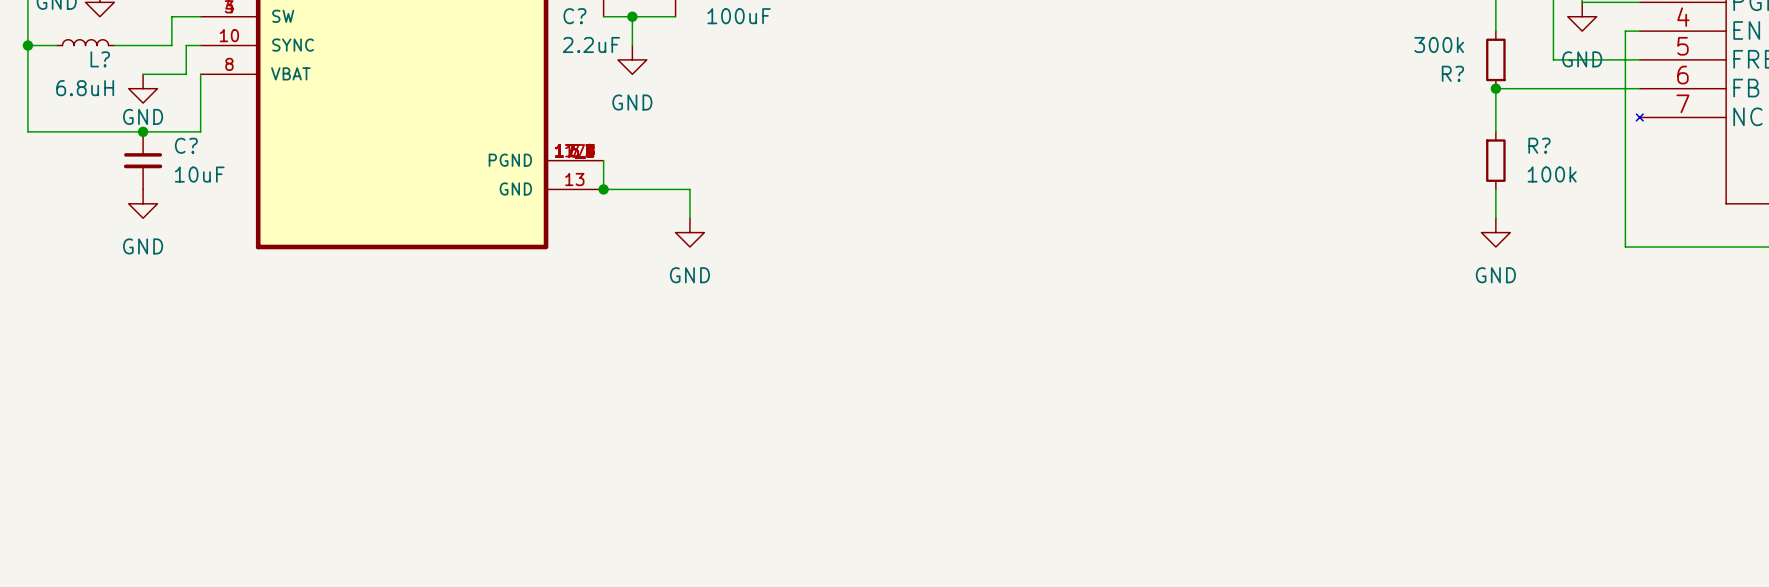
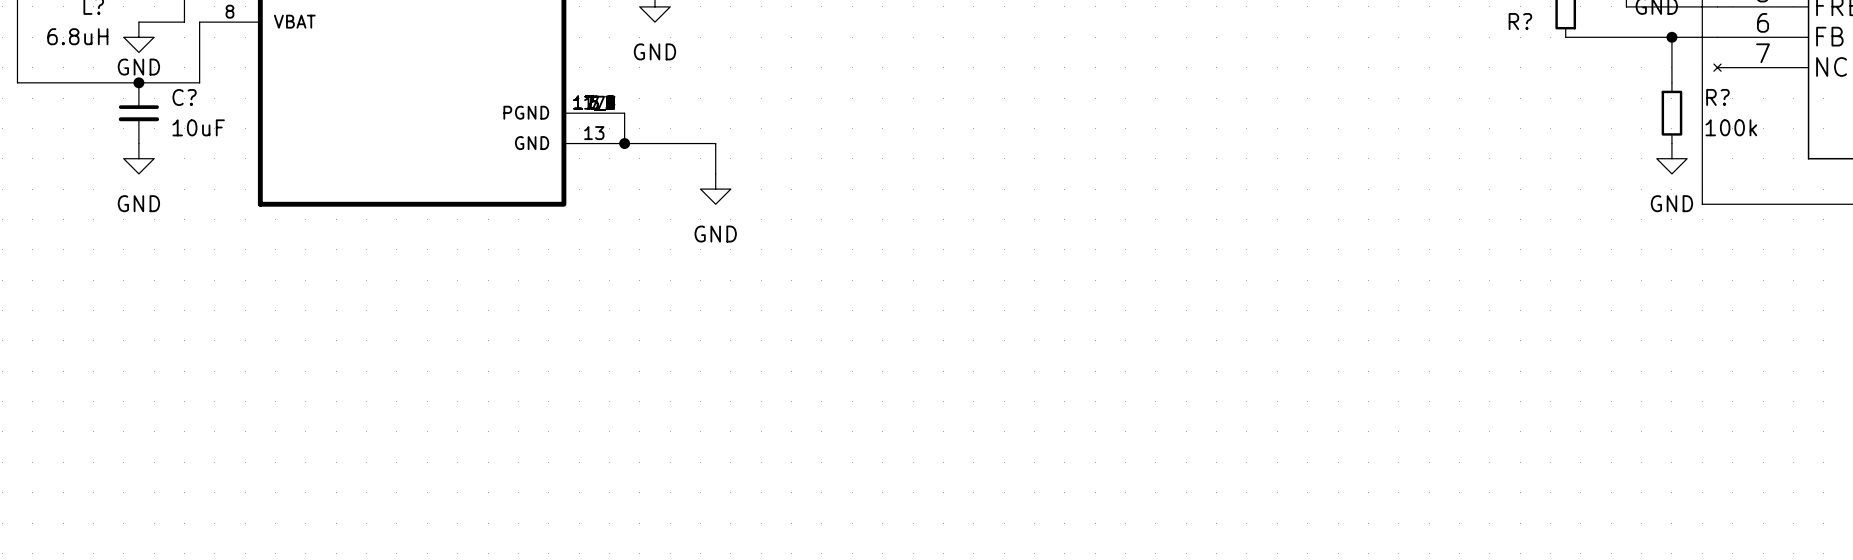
wire: (1495, 88) (1495, 131) -> (1671, 37) (1671, 82)
junction: (1495, 88) -> none
junction: none -> (1671, 37)
R? position: (1495, 160) -> (1671, 113)
wire: (1495, 189) (1495, 218) -> none
power symbol position: GND (1495, 232) -> GND (1671, 158)

